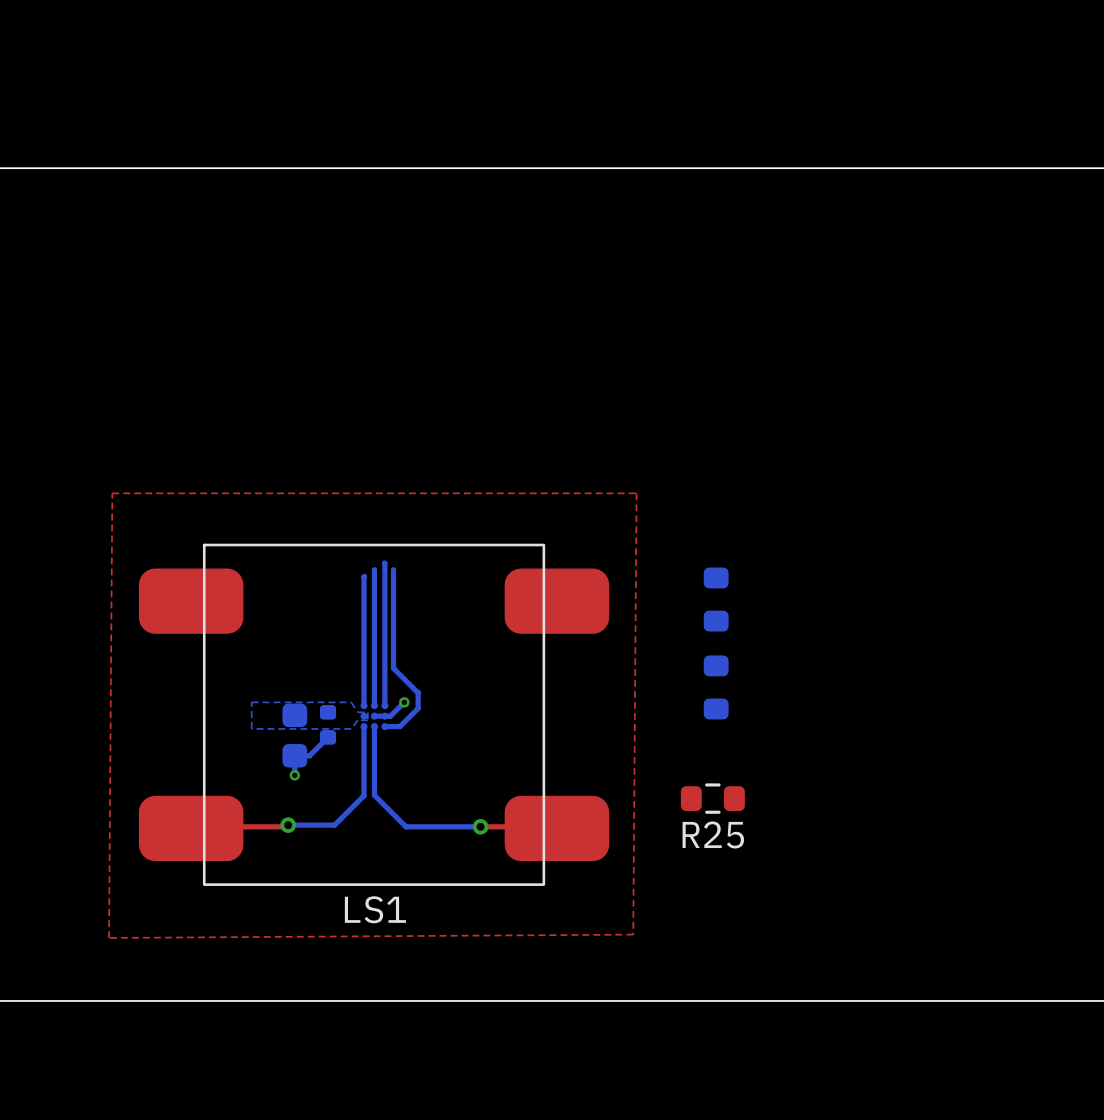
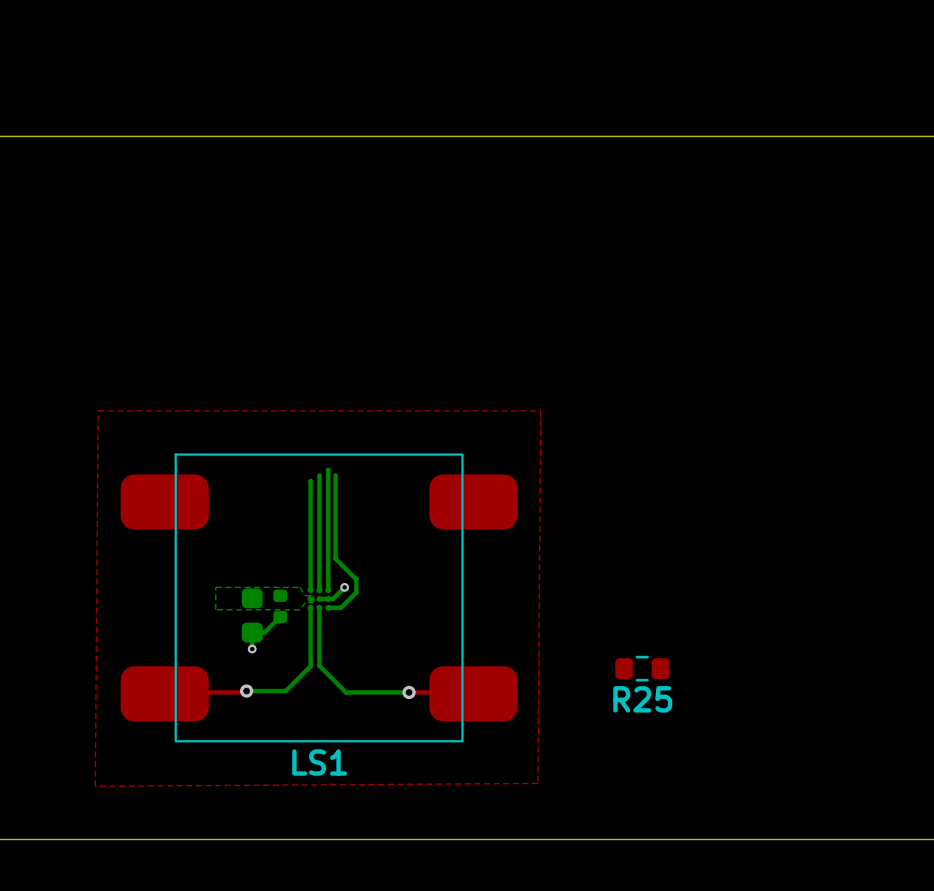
part: (716, 599) -> none
part: (716, 687) -> none
R25 position: (712, 798) -> (642, 668)

